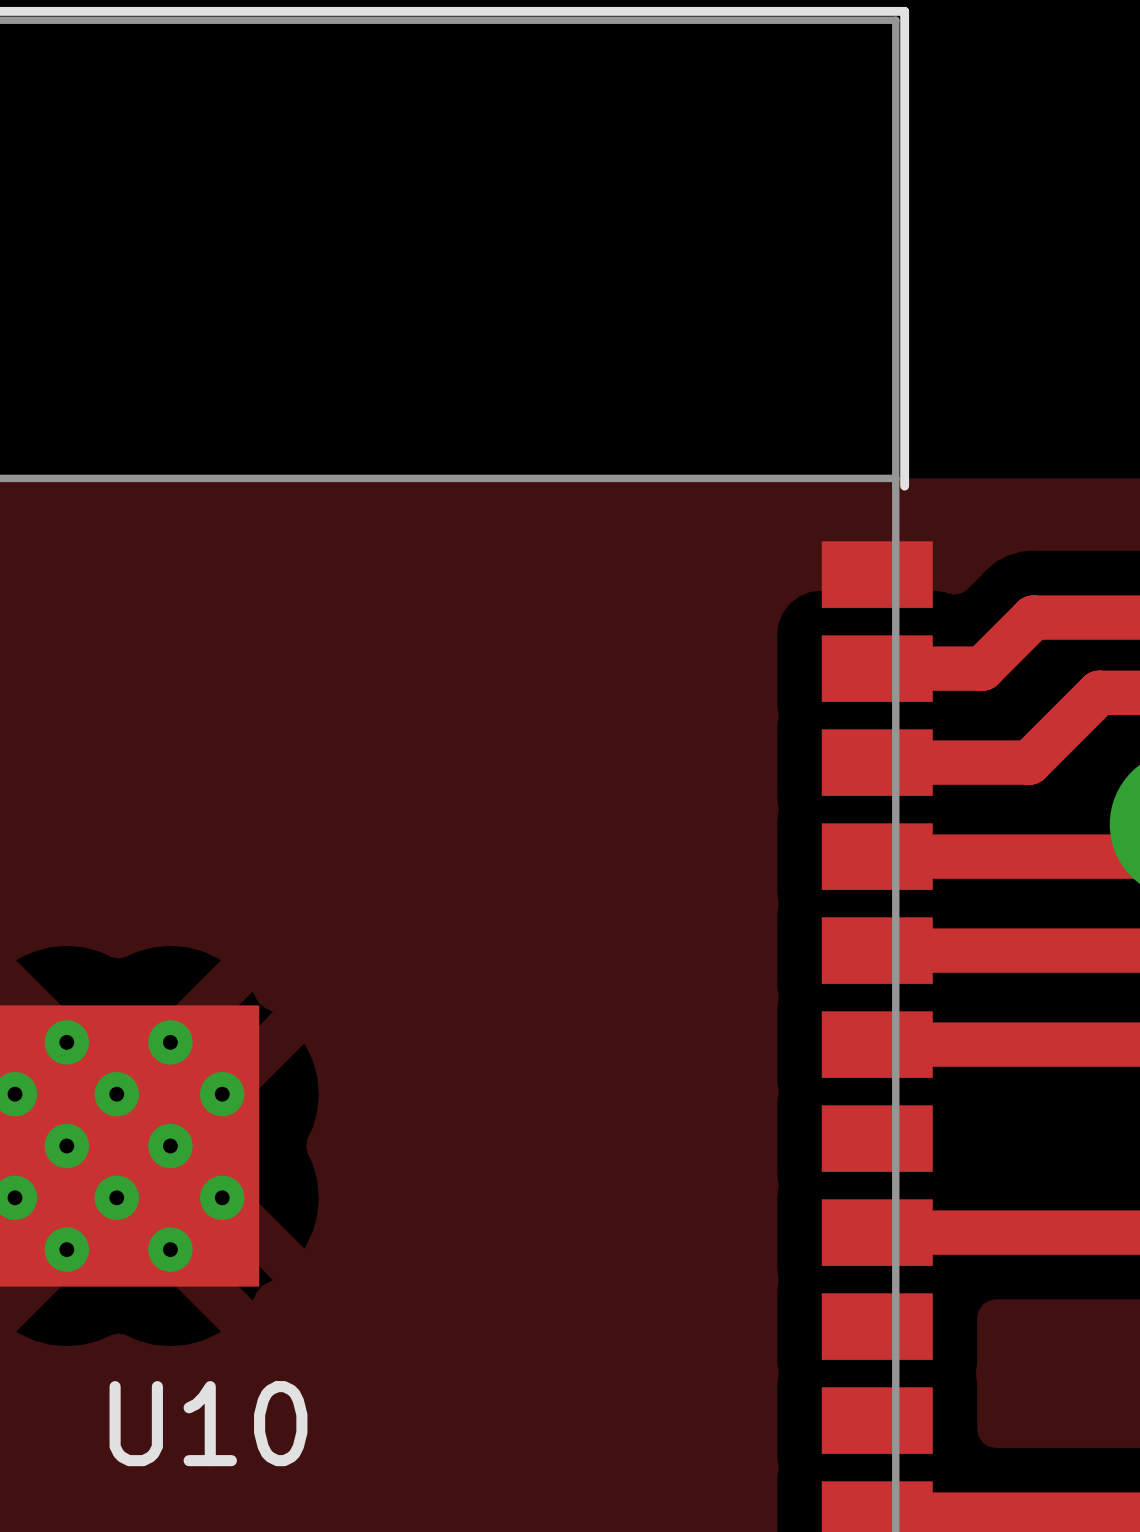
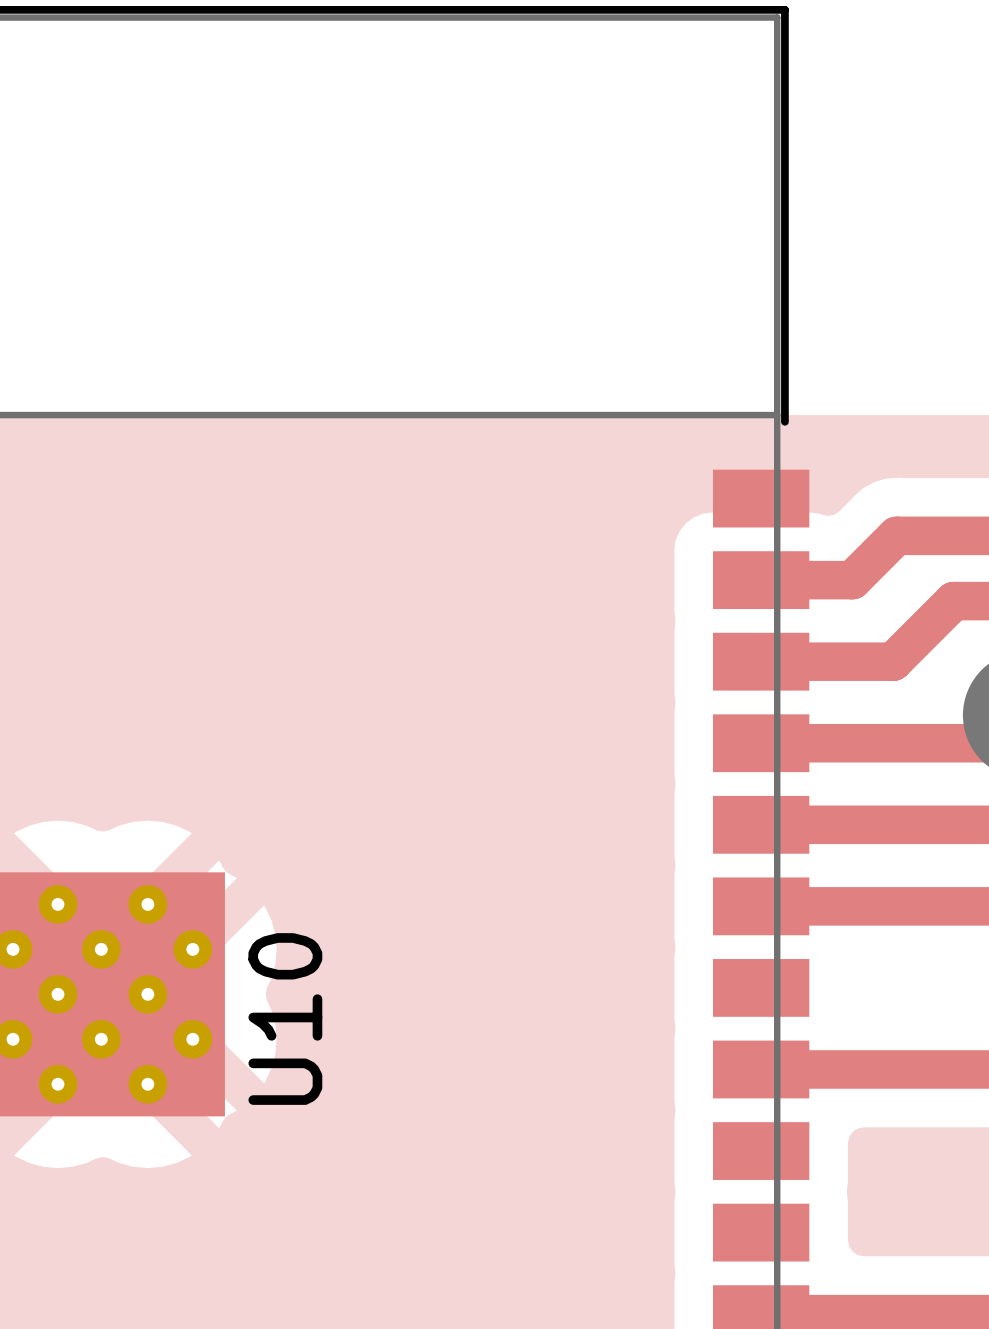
U10 name rotation: 0° (208, 1423) -> 90° counterclockwise (285, 1019)
U10 name position: U10 (208, 1423) -> U10 (285, 1019)

